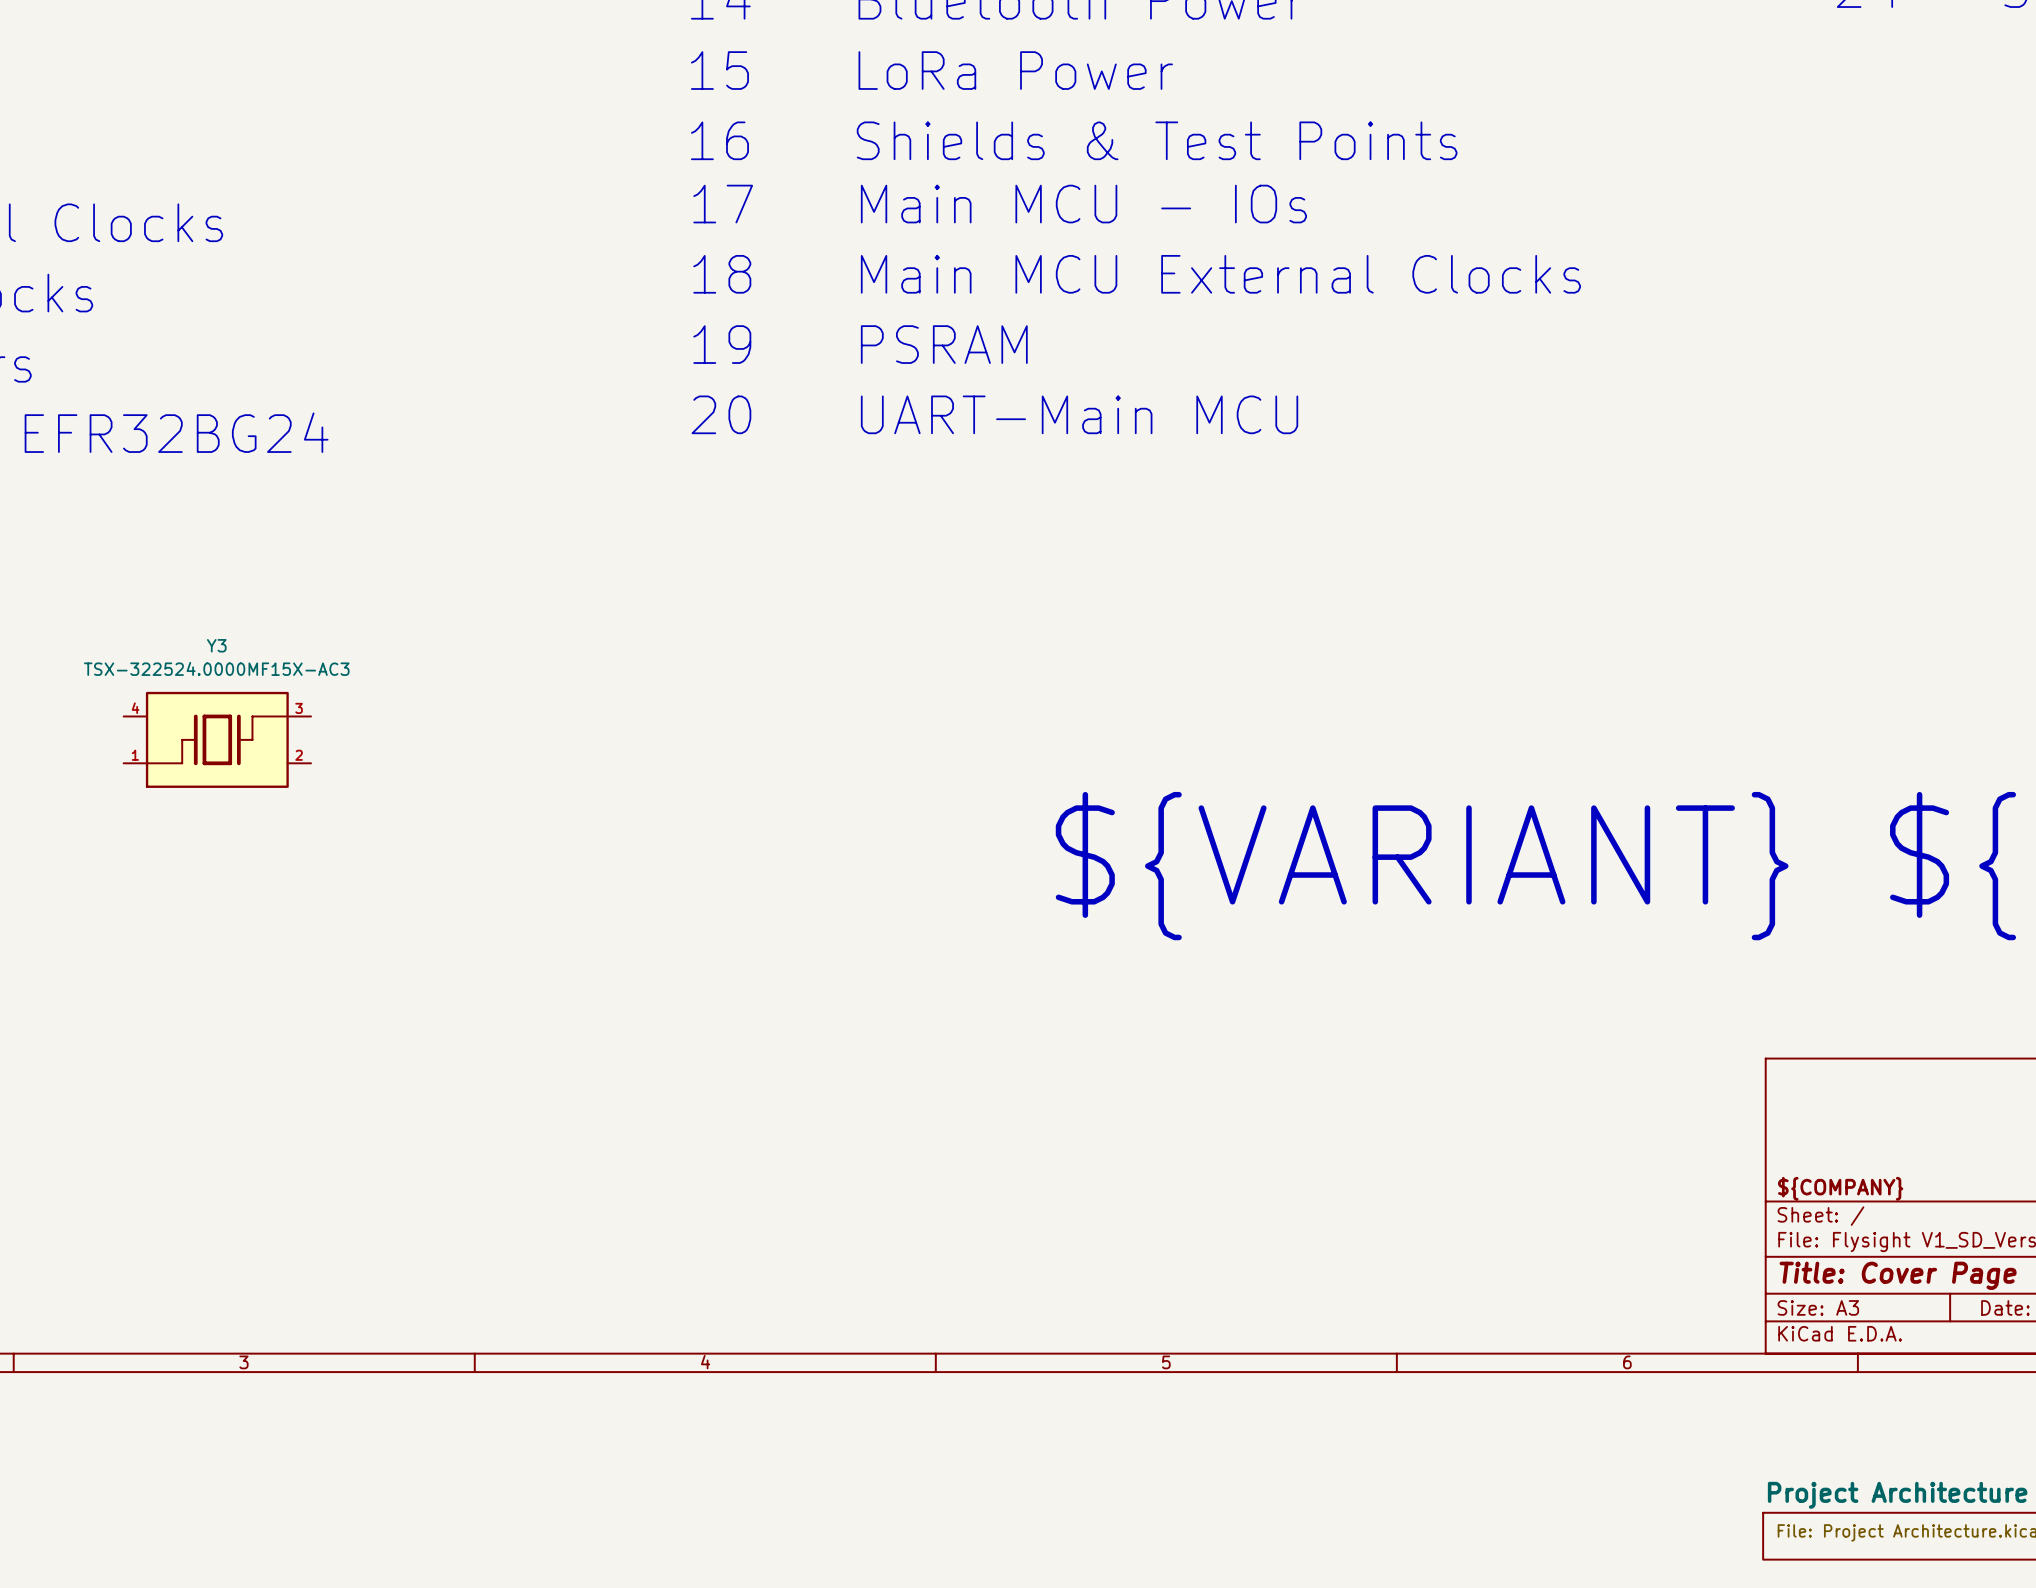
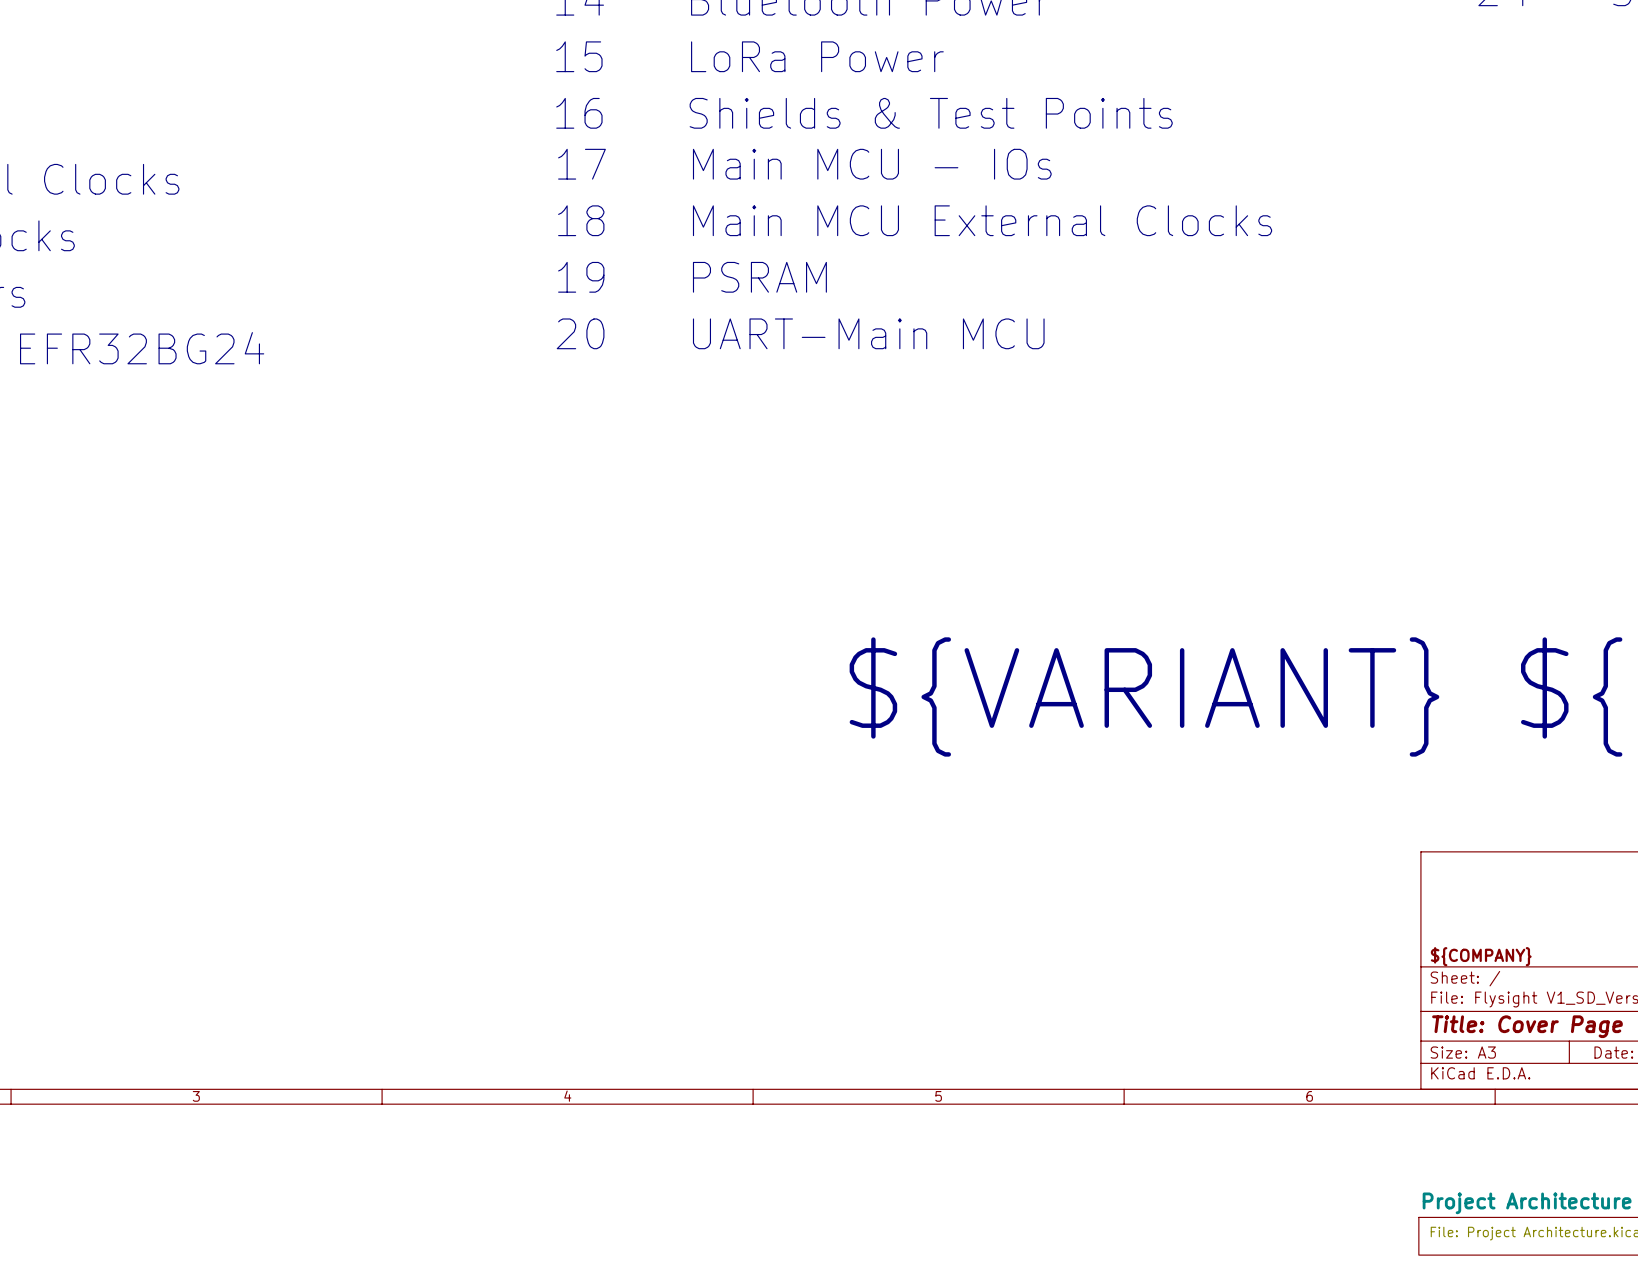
Y3: TSX-322524.0000MF15X-AC3 (217, 739) -> none

